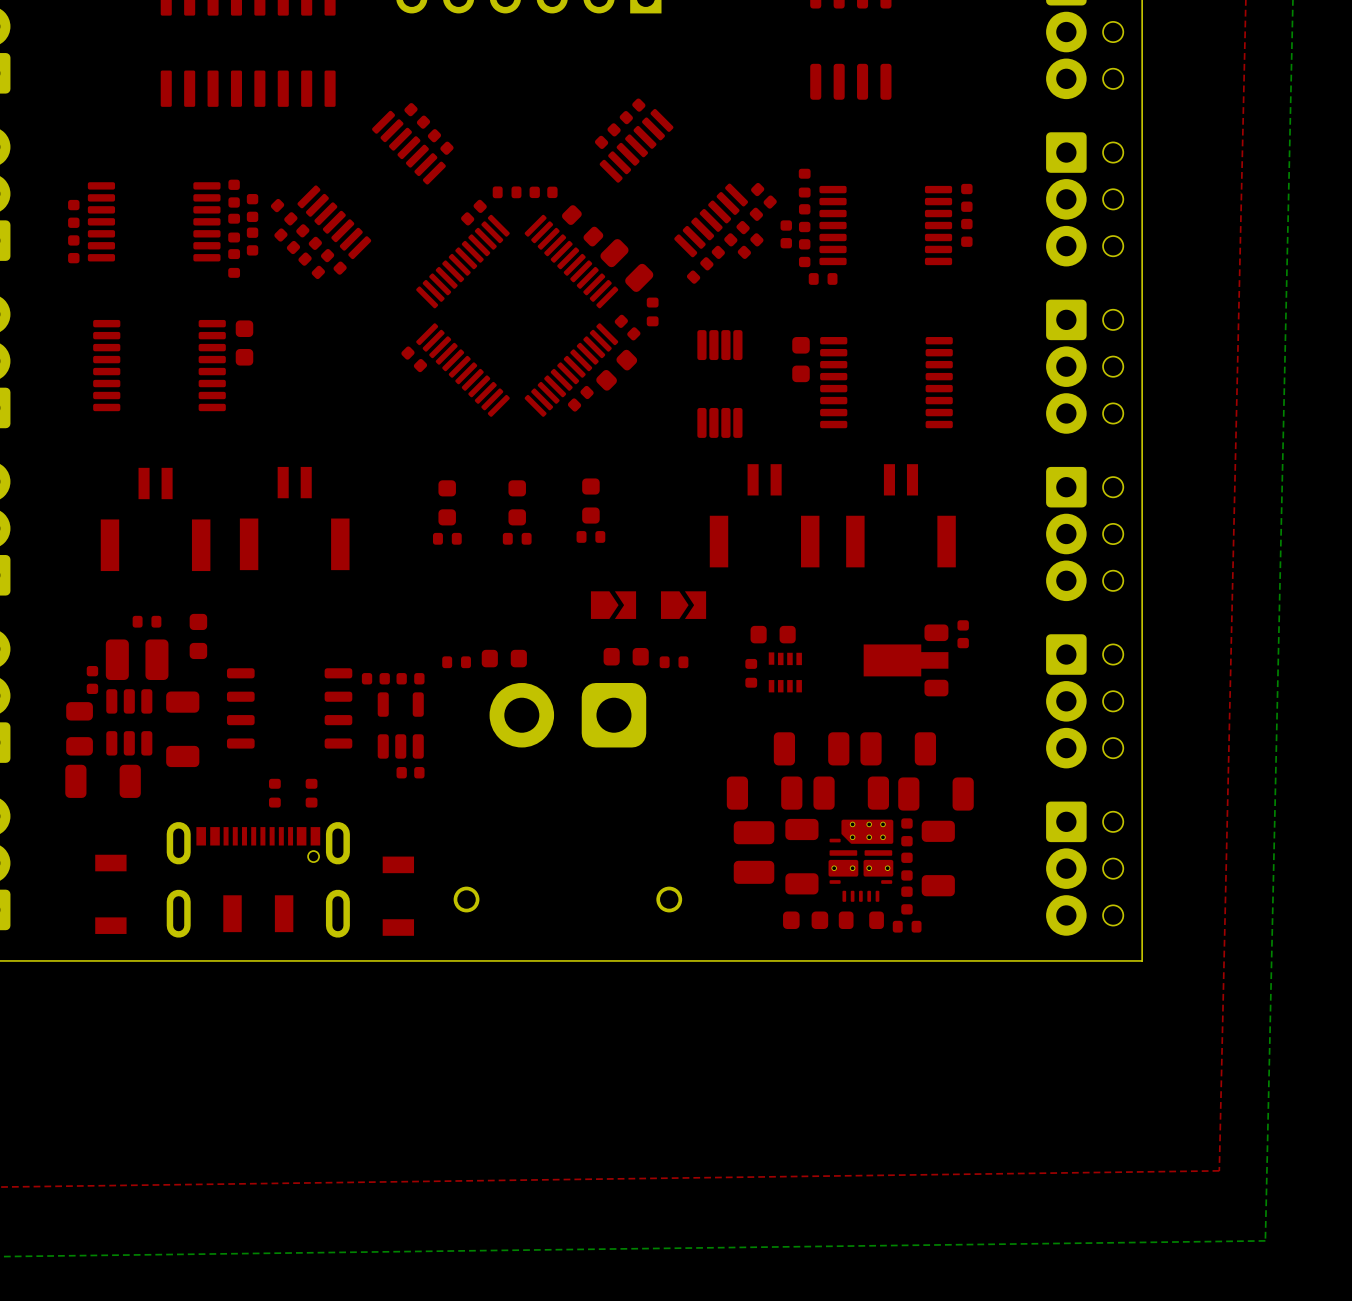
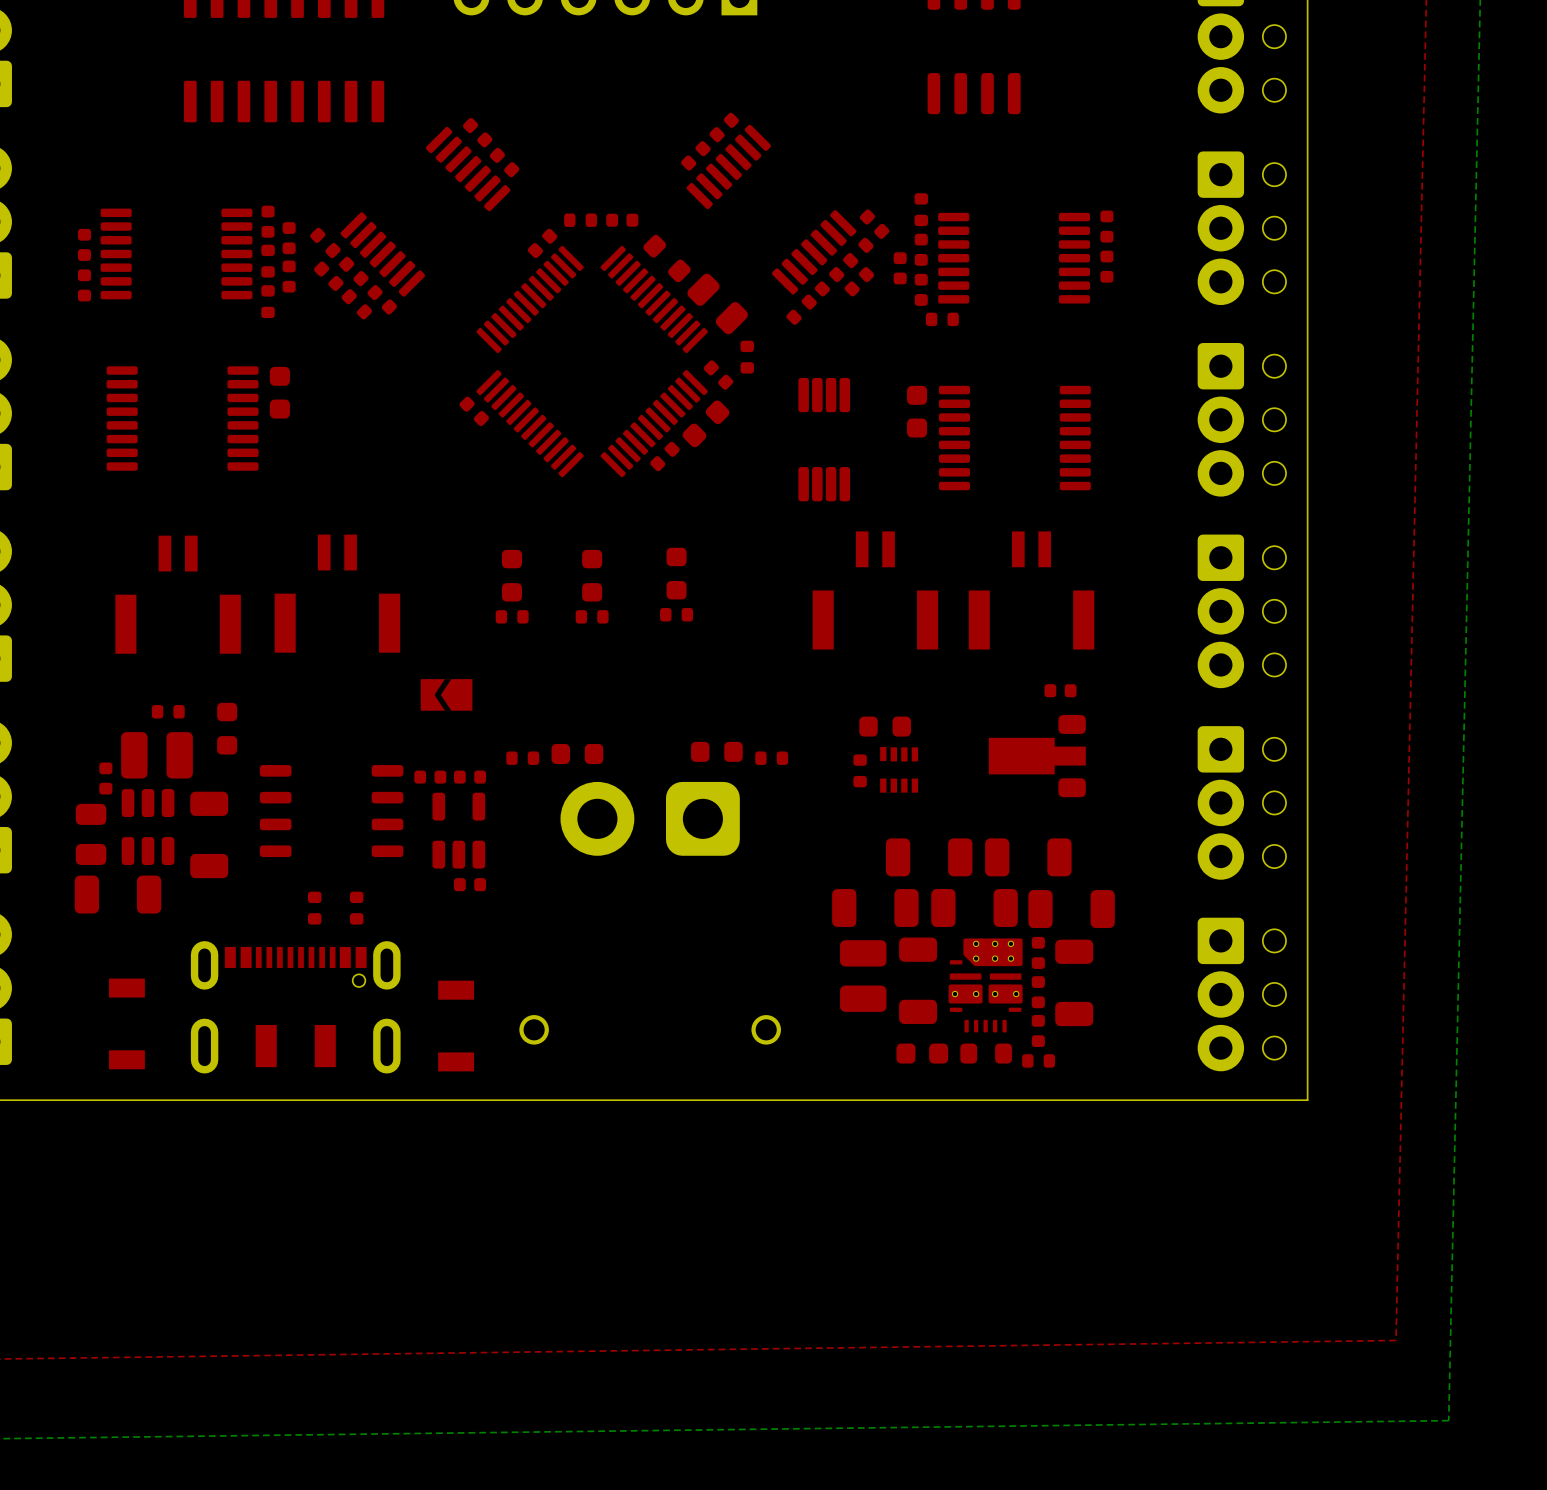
part: (613, 605) -> none
part: (683, 605) -> none
part: none -> (446, 694)
part rotation: 0° (963, 634) -> 90° clockwise (1060, 690)
part position: (963, 634) -> (1060, 690)

